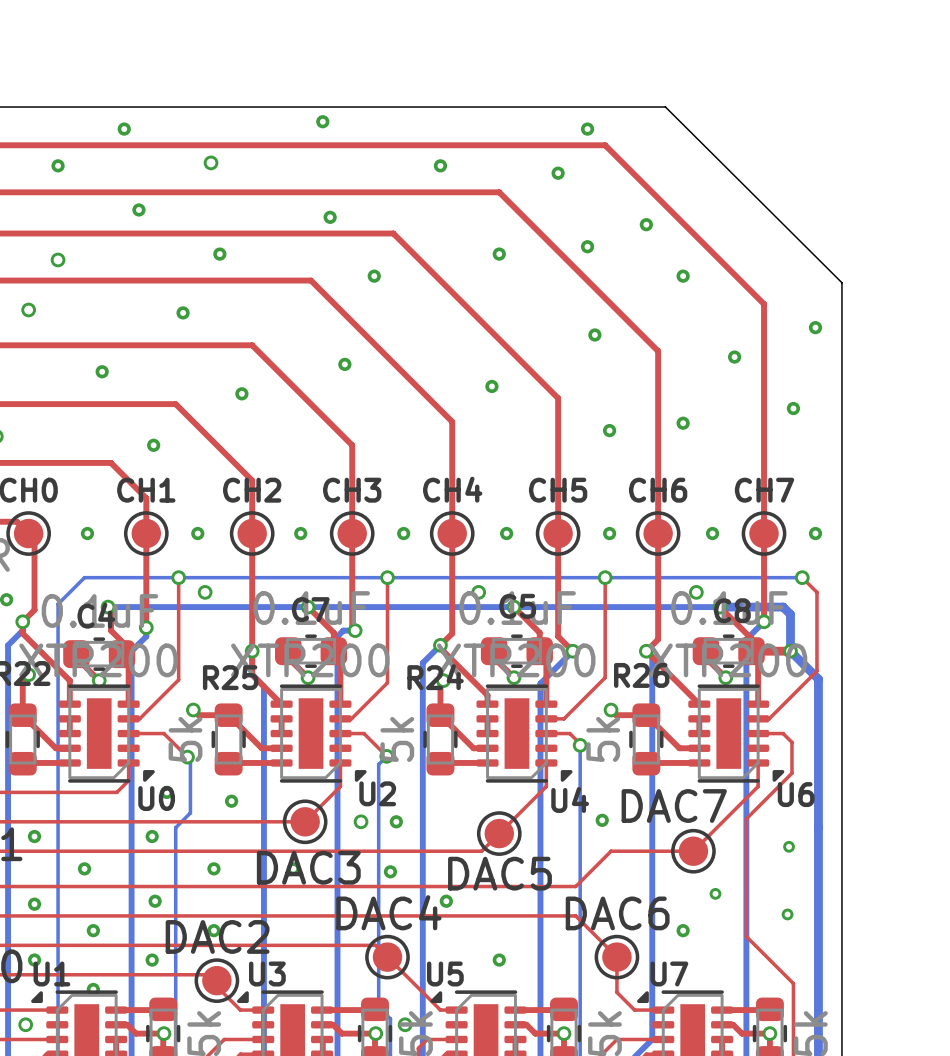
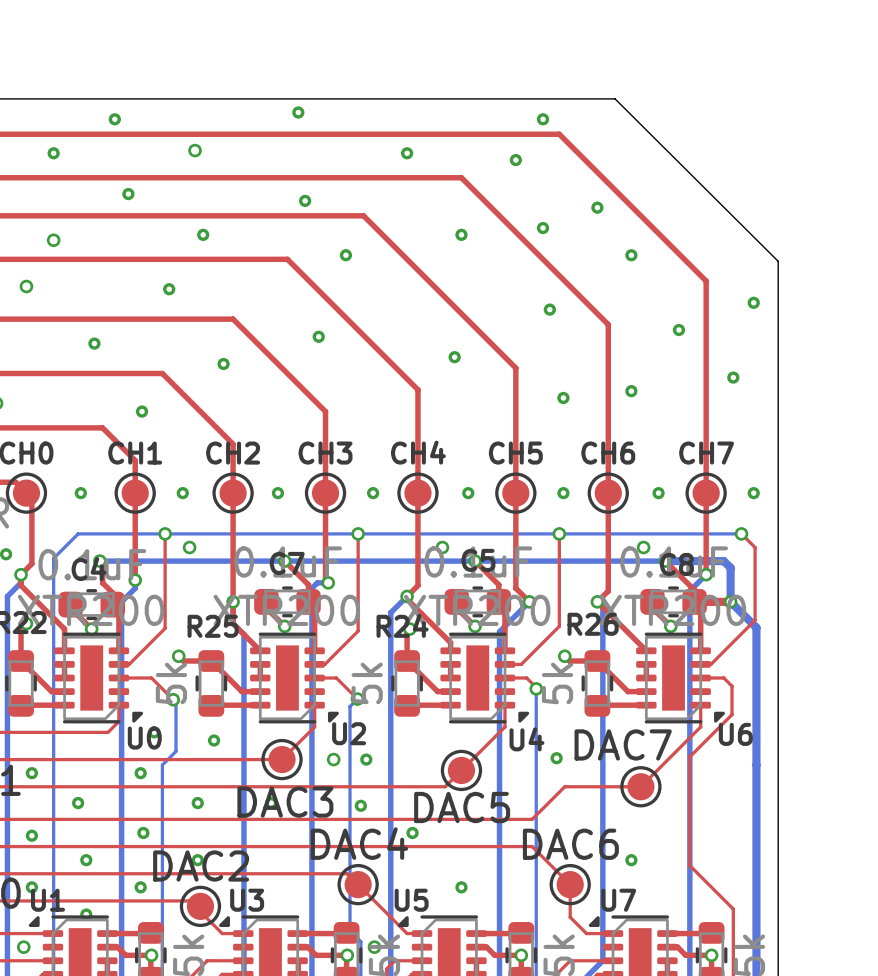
via: (789, 846) -> none
via: (715, 893) -> none
via: (787, 914) -> none

